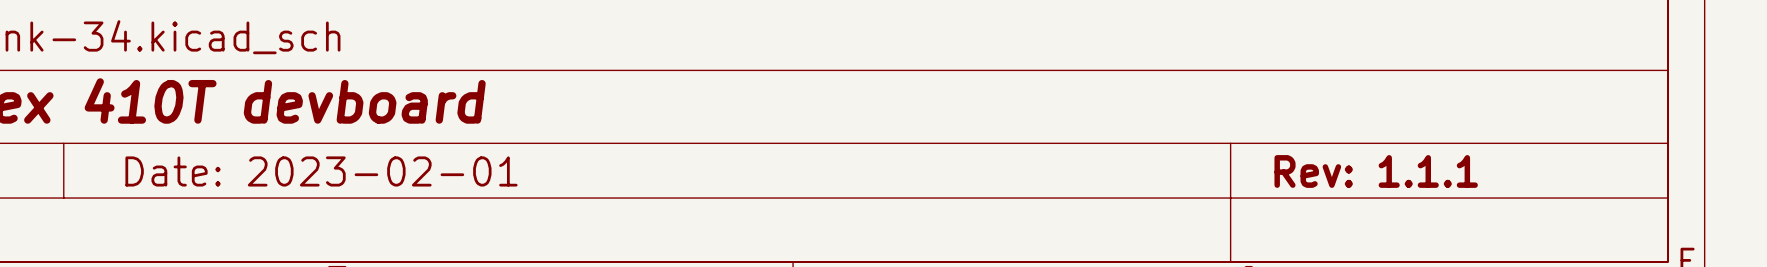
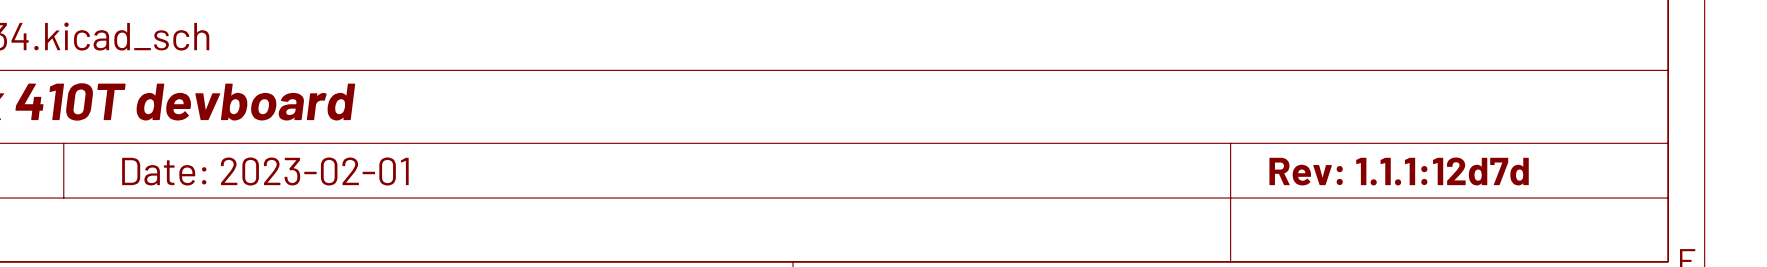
title block: Rev: 1.1.1 (1376, 171) -> Rev: 1.1.1:12d7d (1399, 171)

